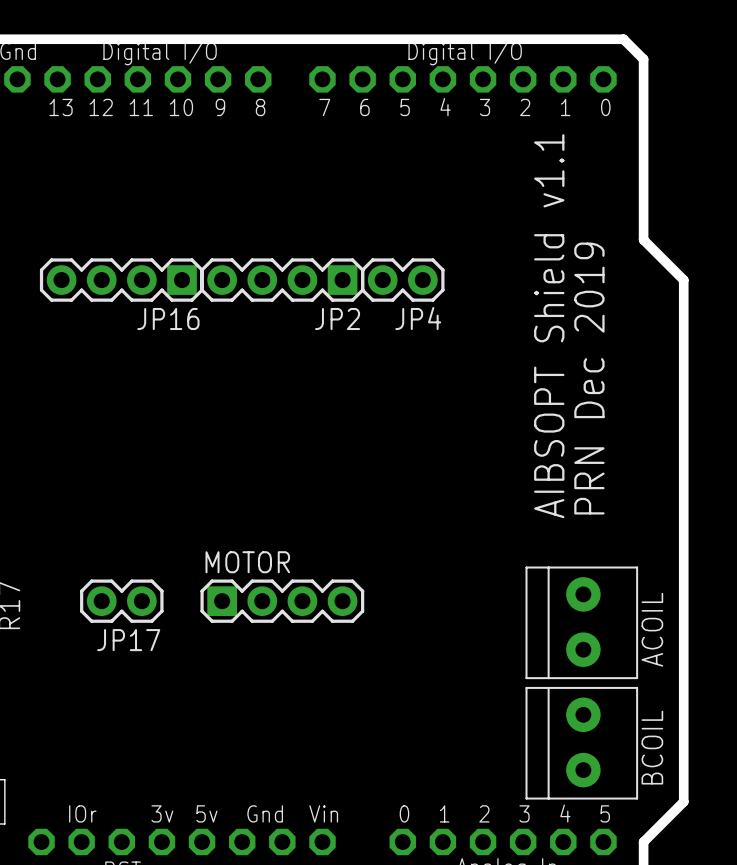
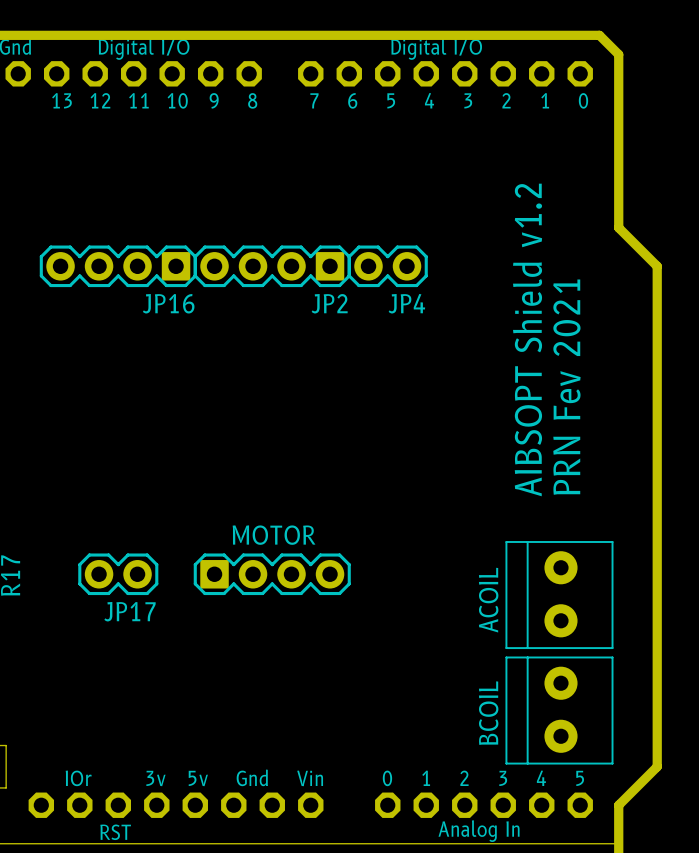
text: AIBSOPT Shield v1.1 (549, 326) -> AIBSOPT Shield v1.2 (527, 339)
text: PRN Dec 2019 (589, 378) -> PRN Fev 2021 (566, 387)
MOTOR name position: MOTOR (247, 562) -> MOTOR (274, 535)
ACOIL name position: ACOIL (652, 629) -> ACOIL (488, 600)
BCOIL name position: BCOIL (652, 747) -> BCOIL (488, 713)

